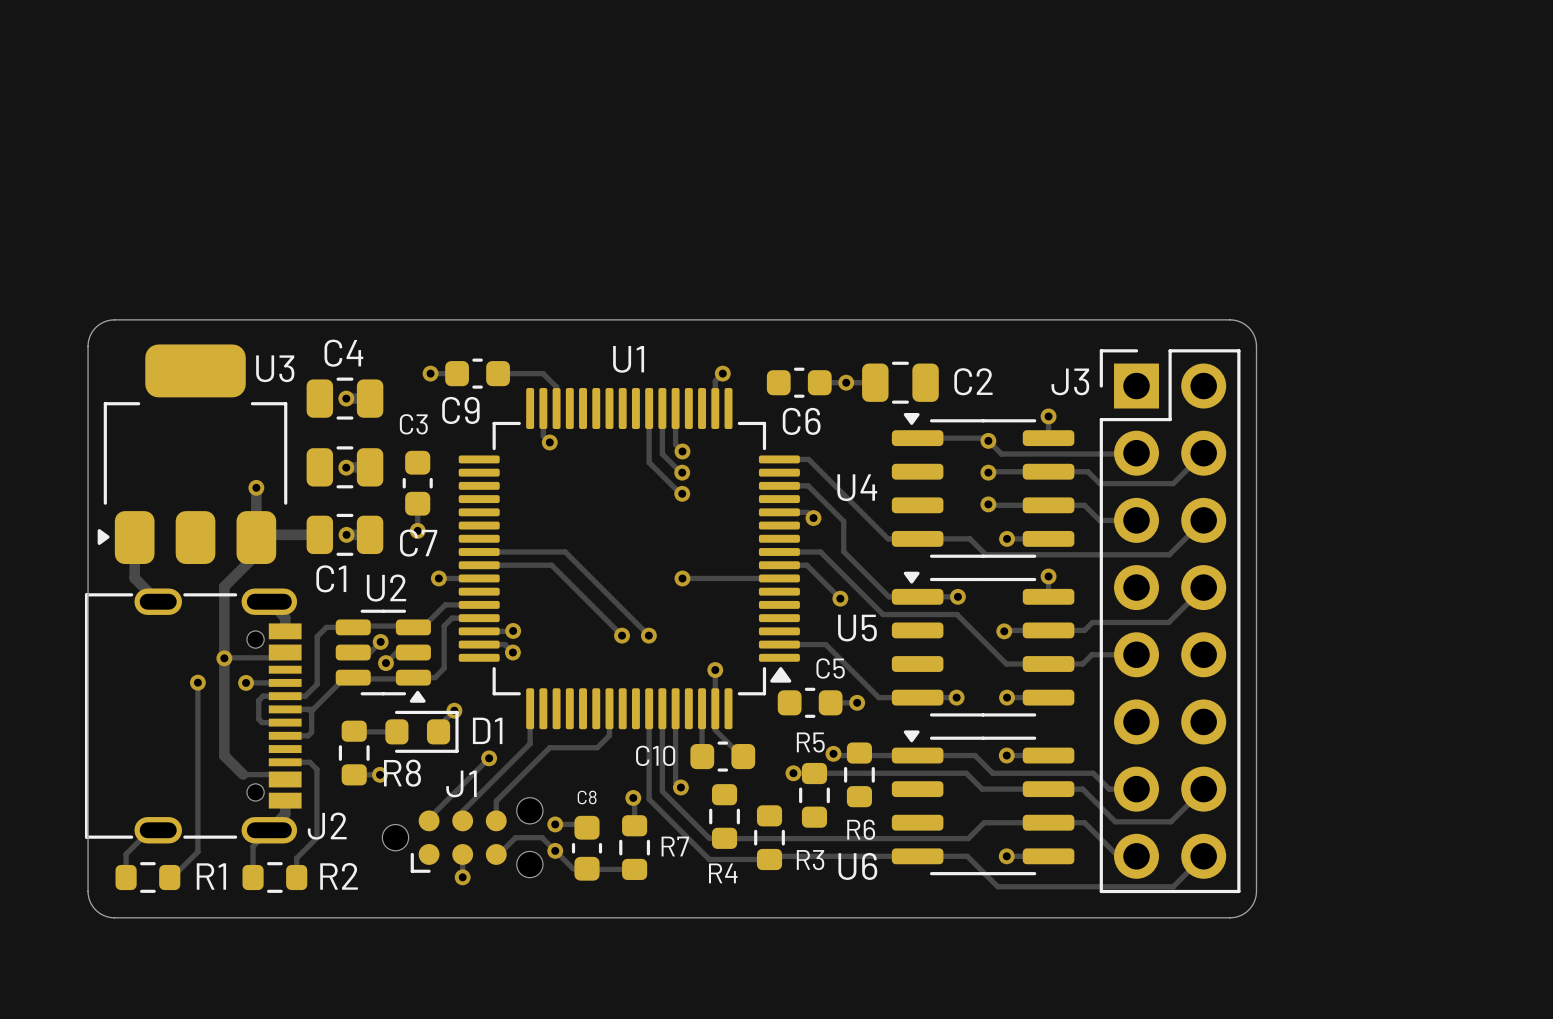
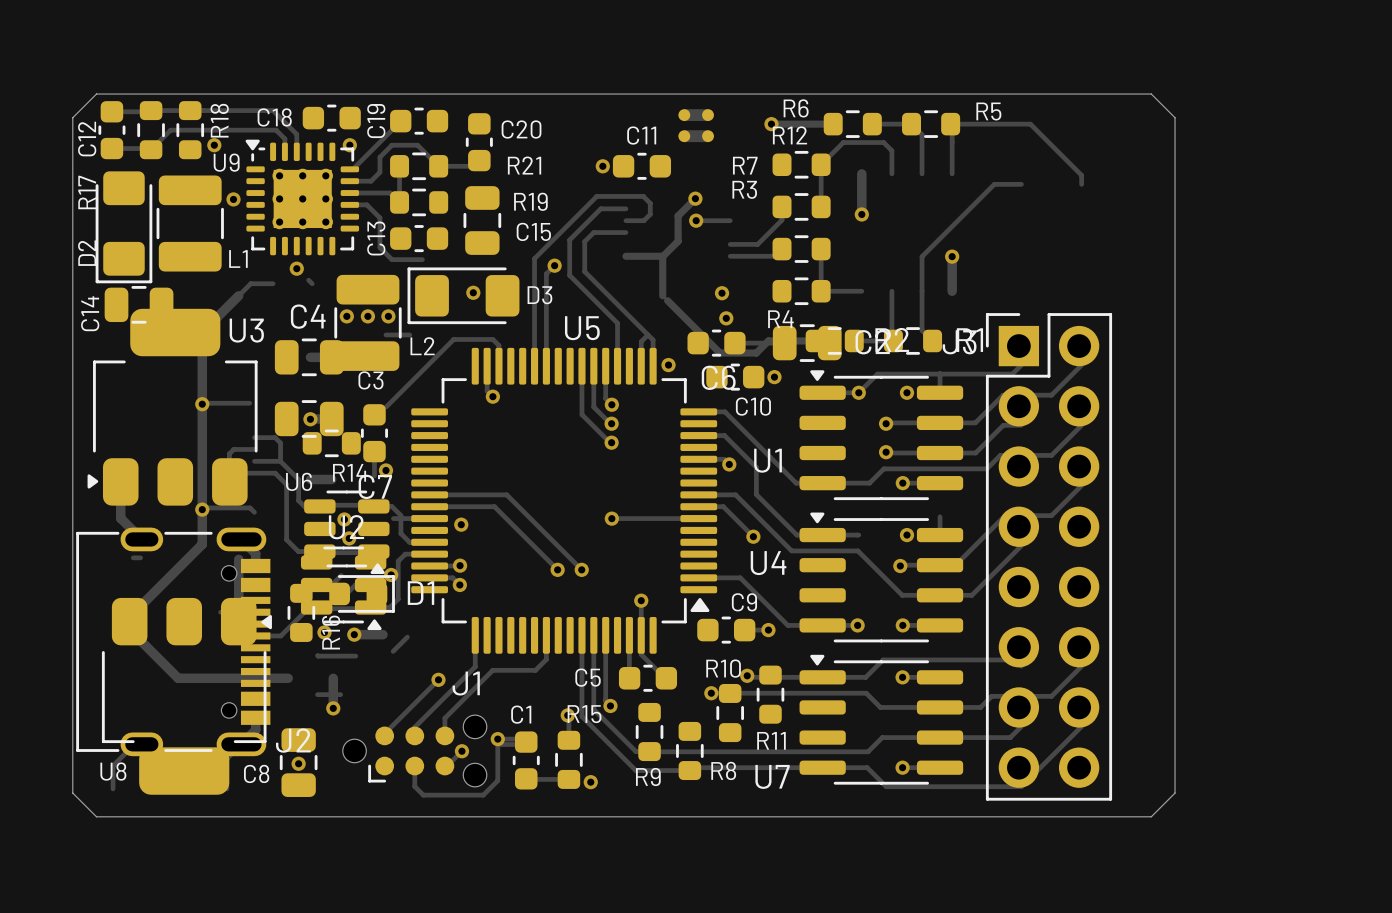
track: none -> (119, 111) (273, 110) (296, 134) (296, 151)
part: none -> (696, 115)
C18: none -> (331, 118)
track: none -> (400, 118) (400, 121) (352, 169) (349, 169)
C19: none -> (419, 121)
track: none -> (769, 124) (833, 124)
via: none -> (771, 124)
R6: none -> (852, 124)
track: none -> (872, 124) (911, 124) (922, 134) (922, 173)
R5: none -> (931, 124)
C12: none -> (111, 130)
R17: none -> (151, 130)
R18: none -> (190, 130)
part: none -> (696, 136)
C20: none -> (479, 142)
via: none -> (214, 145)
via: none -> (349, 145)
track: none -> (119, 148) (152, 148) (170, 130) (276, 130) (284, 138) (284, 151)
track: none -> (479, 160) (473, 166) (438, 166) (417, 145) (392, 145) (379, 157) (379, 172) (371, 181) (350, 181)
R12: none -> (801, 164)
R21: none -> (419, 166)
via: none -> (602, 166)
C11: none -> (641, 166)
track: none -> (399, 172) (399, 202) (390, 193) (355, 193)
track: none -> (861, 173) (861, 214)
track: none -> (891, 173) (891, 150) (883, 142) (843, 142) (821, 164) (821, 206)
track: none -> (952, 173) (950, 124) (1030, 124) (1081, 175) (1081, 184)
track: none -> (1021, 184) (994, 184) (922, 256) (922, 330) (932, 340)
U9: none -> (302, 197)
track: none -> (695, 198) (678, 215) (678, 241) (662, 256) (662, 295)
via: none -> (695, 198)
via: none -> (233, 199)
R19: none -> (419, 202)
track: none -> (349, 204) (366, 204) (379, 217) (379, 247) (392, 259) (422, 259)
track: none -> (782, 206) (782, 220) (757, 244) (730, 244)
R7: none -> (801, 206)
track: none -> (625, 208) (600, 208) (569, 239) (569, 275) (617, 323) (617, 366)
via: none -> (861, 214)
C15: none -> (482, 220)
track: none -> (625, 220) (643, 220) (650, 214) (650, 203) (643, 196) (596, 196) (534, 258) (534, 366)
track: none -> (696, 220) (730, 220)
via: none -> (696, 220)
L1: none -> (190, 223)
D2: none -> (123, 227)
track: none -> (625, 232) (593, 232) (584, 241) (584, 271) (653, 340) (653, 366)
C13: none -> (419, 238)
track: none -> (782, 249) (774, 256) (730, 256)
R3: none -> (801, 249)
track: none -> (821, 249) (821, 291) (861, 291)
track: none -> (625, 256) (663, 256)
track: none -> (952, 256) (952, 291)
via: none -> (952, 256)
track: none -> (554, 265) (546, 273) (546, 366)
via: none -> (554, 265)
via: none -> (296, 268)
track: none -> (308, 280) (312, 283)
track: none -> (273, 283) (250, 283) (202, 332) (202, 544) (129, 616) (129, 629) (178, 678) (288, 678)
board edge: (114, 319) (1230, 319) (1241, 322) (1252, 332) (1256, 346) (1256, 891) (1253, 902) (1244, 913) (1230, 917) (114, 917) (103, 915) (92, 905) (88, 891) (88, 346) (90, 334) (95, 327) (105, 321) (114, 319) -> (96, 94) (72, 117) (72, 793) (96, 816) (1151, 816) (1175, 793) (1175, 117) (1151, 94) (96, 94)
R4: none -> (801, 291)
track: none -> (891, 291) (893, 340) (854, 340)
via: none -> (473, 292)
via: none -> (722, 293)
D3: none -> (463, 295)
track: none -> (667, 300) (719, 353) (756, 353) (768, 340) (815, 340)
C14: none -> (139, 304)
via: none -> (346, 316)
via: none -> (367, 316)
via: none -> (388, 316)
via: none -> (726, 318)
U1 name: U1 (628, 359) -> U5 (582, 328)
L2: none -> (368, 322)
via: (430, 373) -> none
C9: (477, 373) -> none
track: (494, 373) (543, 373) (556, 387) -> (386, 406) (453, 339) (492, 339) (498, 347)
via position: (722, 373) -> (668, 365)
via: (846, 382) -> none
via: (346, 398) -> none
via: (1048, 416) -> none
C10: none -> (735, 377)
via: none -> (774, 377)
track: (957, 438) (985, 438) (1001, 454) (1136, 453) -> (858, 392) (877, 374) (1012, 374) (1021, 365)
via: none -> (858, 392)
via: none -> (906, 392)
via: (988, 440) -> none
track: none -> (208, 403) (249, 403)
via: none -> (202, 404)
track: (1203, 453) (1173, 483) (1099, 483) (1087, 471) -> (1081, 365) (1051, 395) (1003, 395) (975, 422)
track: (256, 487) (256, 554) (224, 586) (224, 755) (243, 774) (280, 774) (285, 779) -> none
via: (256, 487) -> none
U4 name: U4 (857, 487) -> U1 (768, 460)
track: none -> (254, 437) (275, 437) (280, 443) (280, 461)
R14: none -> (331, 443)
track: none -> (254, 449) (233, 449) (229, 453) (229, 468) (233, 473) (275, 473) (286, 484) (286, 539) (298, 551) (373, 551)
track: (1084, 505) (1099, 520) (1136, 520) -> (972, 453) (975, 453) (1003, 425) (1021, 425)
track: none -> (254, 461) (280, 461)
track: (1203, 520) (1169, 554) (985, 554) (970, 538) -> (1081, 425) (1051, 455) (1000, 455) (986, 468) (883, 468) (869, 483)
track: (318, 530) (314, 534) (256, 534) -> none
via position: (417, 530) -> (385, 470)
C1: (344, 534) -> none
via: (346, 534) -> none
track: none -> (202, 509) (203, 507) (250, 507) (254, 512)
via: none -> (202, 509)
via: (1048, 576) -> none
via: (438, 578) -> none
via: none -> (344, 519)
via: none -> (461, 524)
track: (1203, 587) (1168, 622) (1092, 622) (1084, 630) (1065, 630) -> (1081, 485) (1051, 515) (1005, 515) (955, 565)
U6: none -> (346, 532)
via: (957, 596) -> none
via: none -> (906, 535)
via: none -> (349, 538)
track: (456, 604) (445, 604) (422, 627) (326, 627) (317, 636) (317, 684) (305, 696) (263, 696) (258, 700) (258, 719) (262, 722) (285, 722) -> (409, 542) (400, 533) (400, 515) (391, 506) (304, 506) (298, 500) (298, 479) (280, 461)
track: none -> (133, 557) (140, 557)
track: none -> (240, 557) (238, 621)
U5 name: U5 (857, 628) -> U4 (768, 563)
via: (380, 641) -> none
via: none -> (391, 574)
track: (285, 652) (279, 657) (224, 657) -> none
track: (1136, 654) (1091, 654) (1082, 664) -> (1021, 545) (970, 595)
via: (224, 658) -> none
via: (385, 663) -> none
C5 name: C5 (830, 668) -> C9 (744, 602)
track: (197, 682) (197, 851) (169, 879) -> none
via: (197, 682) -> none
via: (246, 682) -> none
R16: none -> (301, 612)
via: none -> (324, 632)
track: none -> (354, 634) (382, 634)
via: none -> (354, 634)
track: (308, 709) (311, 712) (311, 732) (308, 735) (285, 735) -> none
via: (454, 710) -> none
D1 position: (421, 731) -> (362, 593)
R5 name: R5 (810, 742) -> R10 (723, 668)
R8: (354, 753) -> none
C10 name: C10 (655, 755) -> C5 (588, 677)
track: (965, 755) (975, 755) (992, 773) (1093, 773) (1109, 789) (1136, 789) -> (865, 677) (883, 659) (1015, 659) (1021, 666)
track: none -> (333, 678) (333, 708)
track: (285, 762) (309, 762) (316, 769) (316, 837) (296, 858) (296, 879) -> none
via position: (380, 774) -> (333, 708)
U8: none -> (186, 696)
J1 name position: J1 (461, 783) -> J1 (466, 683)
track: (1082, 789) (1115, 821) (1171, 821) (1203, 789) -> (970, 707) (980, 707) (991, 696) (1051, 696) (1081, 666)
C8 name: C8 (587, 797) -> C1 (521, 714)
track: (1084, 822) (1118, 856) (1136, 856) -> (972, 737) (1010, 737) (1021, 726)
R6 name: R6 (861, 829) -> R11 (771, 740)
track: none -> (523, 744) (497, 744) (497, 780) (483, 795) (423, 795) (414, 786)
track: (515, 837) (542, 837) (573, 868) (587, 868) -> none
via: none -> (461, 751)
R7 name: R7 (675, 846) -> R15 (584, 714)
C8: none -> (298, 762)
via: (555, 850) -> none
via: none -> (298, 763)
track: (1203, 856) (1173, 886) (997, 886) (988, 877) -> (1081, 726) (1021, 786) (886, 786)
R3 name: R3 (810, 860) -> R8 (723, 770)
U6 name: U6 (857, 866) -> U7 (772, 776)
via: none -> (590, 782)
R4 name: R4 (723, 873) -> R9 (648, 776)
R1 position: (147, 877) -> (913, 340)
R2 position: (274, 877) -> (834, 340)
via: (462, 877) -> none

